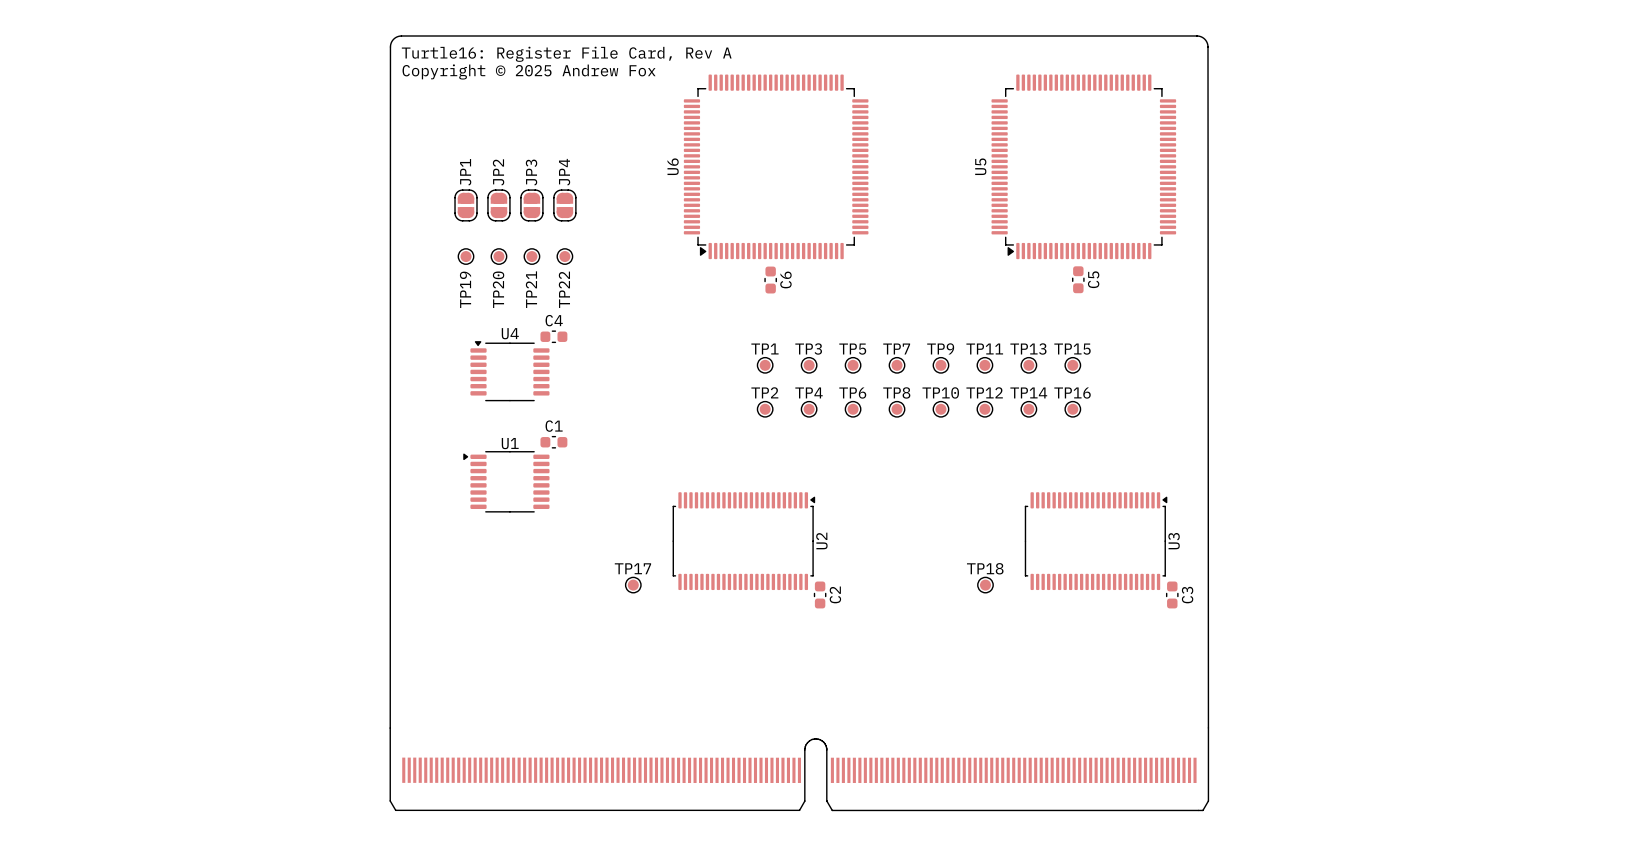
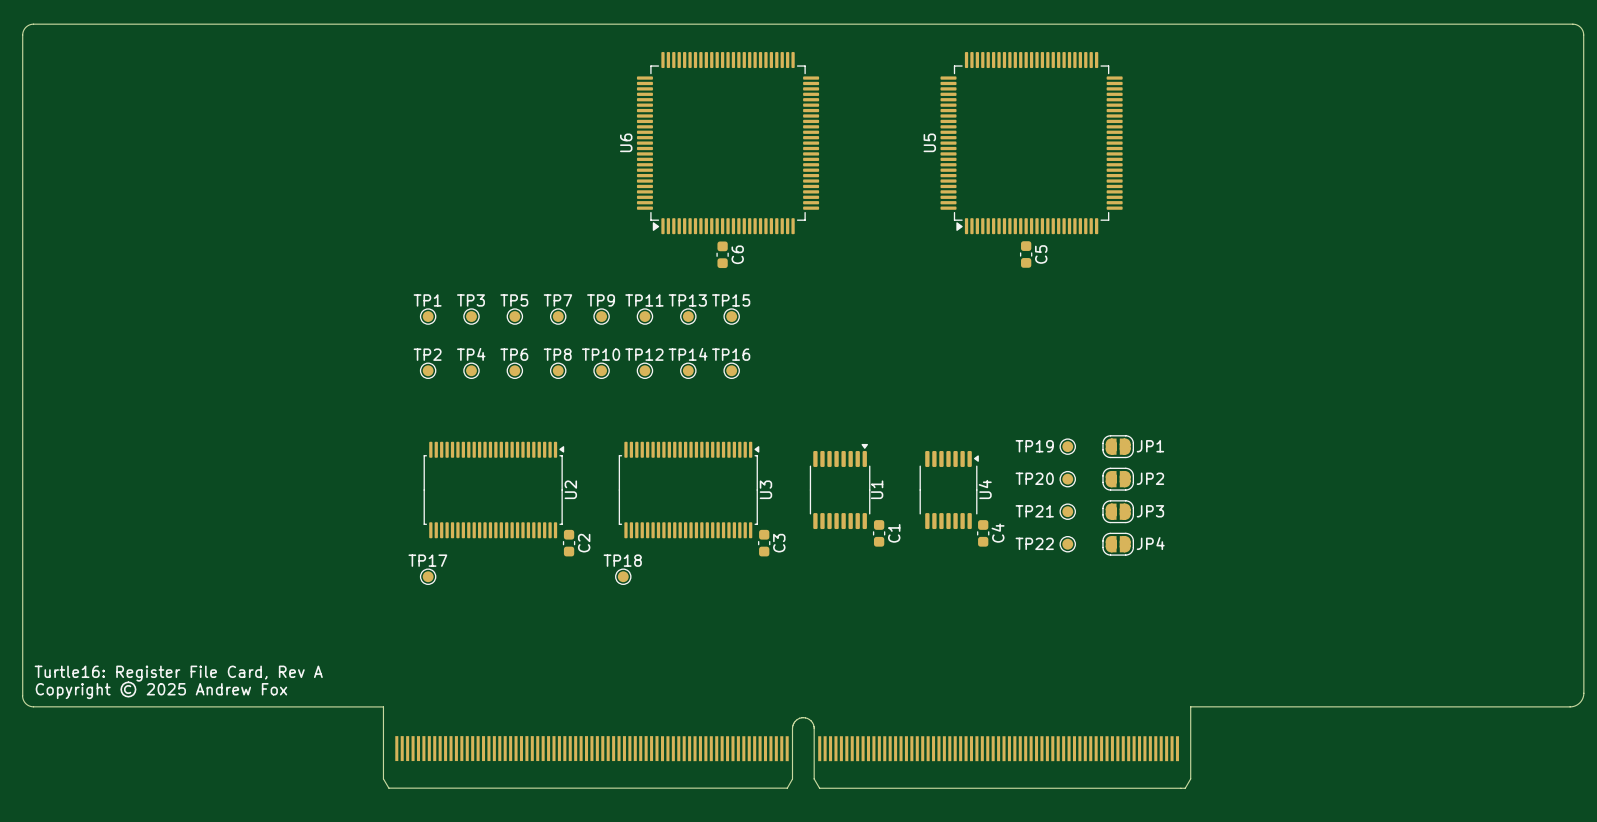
board edge: (1197, 35) (1204, 39) (1207, 46) (1208, 727) -> (1179, 24) (1572, 24) (1580, 27) (1583, 35) (1583, 693) (1581, 700) (1576, 705) (1570, 706) (1190, 706)
board edge: (401, 36) (393, 39) (390, 46) (390, 728) -> (394, 24) (33, 24) (24, 29) (22, 35) (22, 695)
text: Turtle16: Register File Card, Rev A (566, 54) -> none
text: Copyright © 2025 Andrew Fox (529, 71) -> none
U6 position: (776, 166) -> (728, 143)
U5 position: (1083, 166) -> (1031, 143)
JP1 rotation: 0° (466, 205) -> 90° clockwise (1118, 446)
JP1 position: (466, 205) -> (1118, 446)
JP2 rotation: 0° (498, 205) -> 90° clockwise (1118, 479)
JP2 position: (498, 205) -> (1118, 479)
JP3 rotation: 0° (531, 205) -> 90° clockwise (1118, 511)
JP3 position: (531, 205) -> (1118, 511)
JP4 rotation: 0° (564, 205) -> 90° clockwise (1118, 544)
JP4 position: (564, 205) -> (1118, 544)
TP19 position: (466, 256) -> (1067, 446)
TP20 position: (498, 256) -> (1067, 479)
TP21 position: (531, 256) -> (1067, 511)
TP22 position: (564, 256) -> (1067, 544)
C5 position: (1078, 279) -> (1026, 254)
C6 position: (770, 280) -> (722, 254)
TP19 name rotation: 0° (465, 289) -> 90° clockwise (1034, 446)
TP20 name rotation: 0° (498, 289) -> 90° clockwise (1034, 478)
TP21 name rotation: 0° (531, 289) -> 90° clockwise (1034, 511)
TP22 name rotation: 0° (564, 289) -> 90° clockwise (1034, 543)
C4 rotation: 0° (553, 336) -> 90° clockwise (983, 533)
C4 position: (553, 336) -> (983, 533)
TP1 position: (765, 365) -> (428, 316)
TP3 position: (809, 365) -> (471, 316)
TP5 position: (853, 365) -> (514, 316)
TP7 position: (897, 365) -> (558, 316)
TP9 position: (940, 365) -> (601, 316)
TP11 position: (984, 365) -> (644, 316)
TP13 position: (1028, 365) -> (688, 316)
TP15 position: (1072, 365) -> (731, 316)
U4 rotation: 0° (509, 371) -> 90° clockwise (949, 490)
U4 position: (509, 371) -> (949, 490)
TP2 position: (765, 409) -> (428, 370)
TP4 position: (809, 409) -> (471, 370)
TP6 position: (853, 409) -> (514, 370)
TP8 position: (897, 409) -> (558, 370)
TP10 position: (940, 409) -> (601, 370)
TP12 position: (984, 409) -> (644, 370)
TP14 position: (1028, 409) -> (688, 370)
TP16 position: (1072, 409) -> (731, 370)
C1 rotation: 0° (553, 442) -> 90° clockwise (879, 533)
C1 position: (553, 442) -> (879, 533)
U1 rotation: 0° (506, 481) -> 90° clockwise (840, 486)
U1 position: (506, 481) -> (840, 486)
U2 position: (743, 541) -> (493, 490)
U3 position: (1096, 541) -> (689, 490)
TP17 position: (633, 585) -> (428, 576)
TP18 position: (985, 585) -> (623, 576)
C2 position: (820, 594) -> (569, 543)
C3 position: (1172, 594) -> (764, 543)
text: none -> Turtle16: Register File Card, Rev A (178, 673)
text: none -> Copyright © 2025 Andrew Fox (161, 690)
board edge: none -> (22, 695) (25, 703) (33, 706) (383, 706)

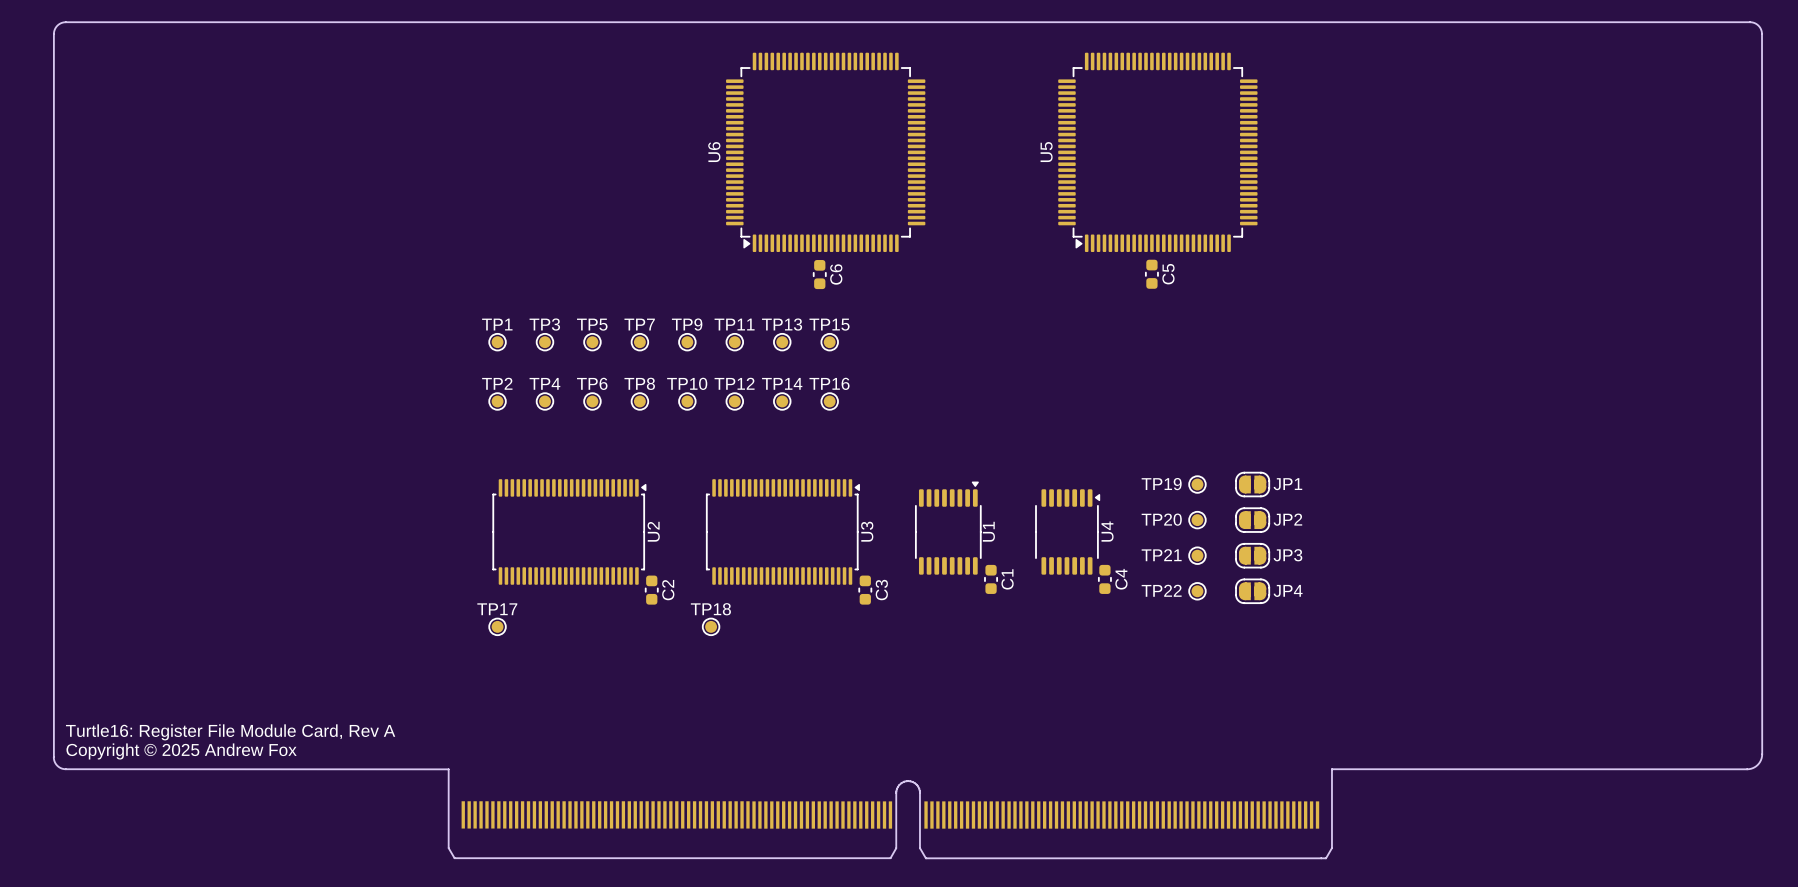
text: Turtle16: Register File Card, Rev A (178, 673) -> Turtle16: Register File Module Card, Rev A (230, 732)

